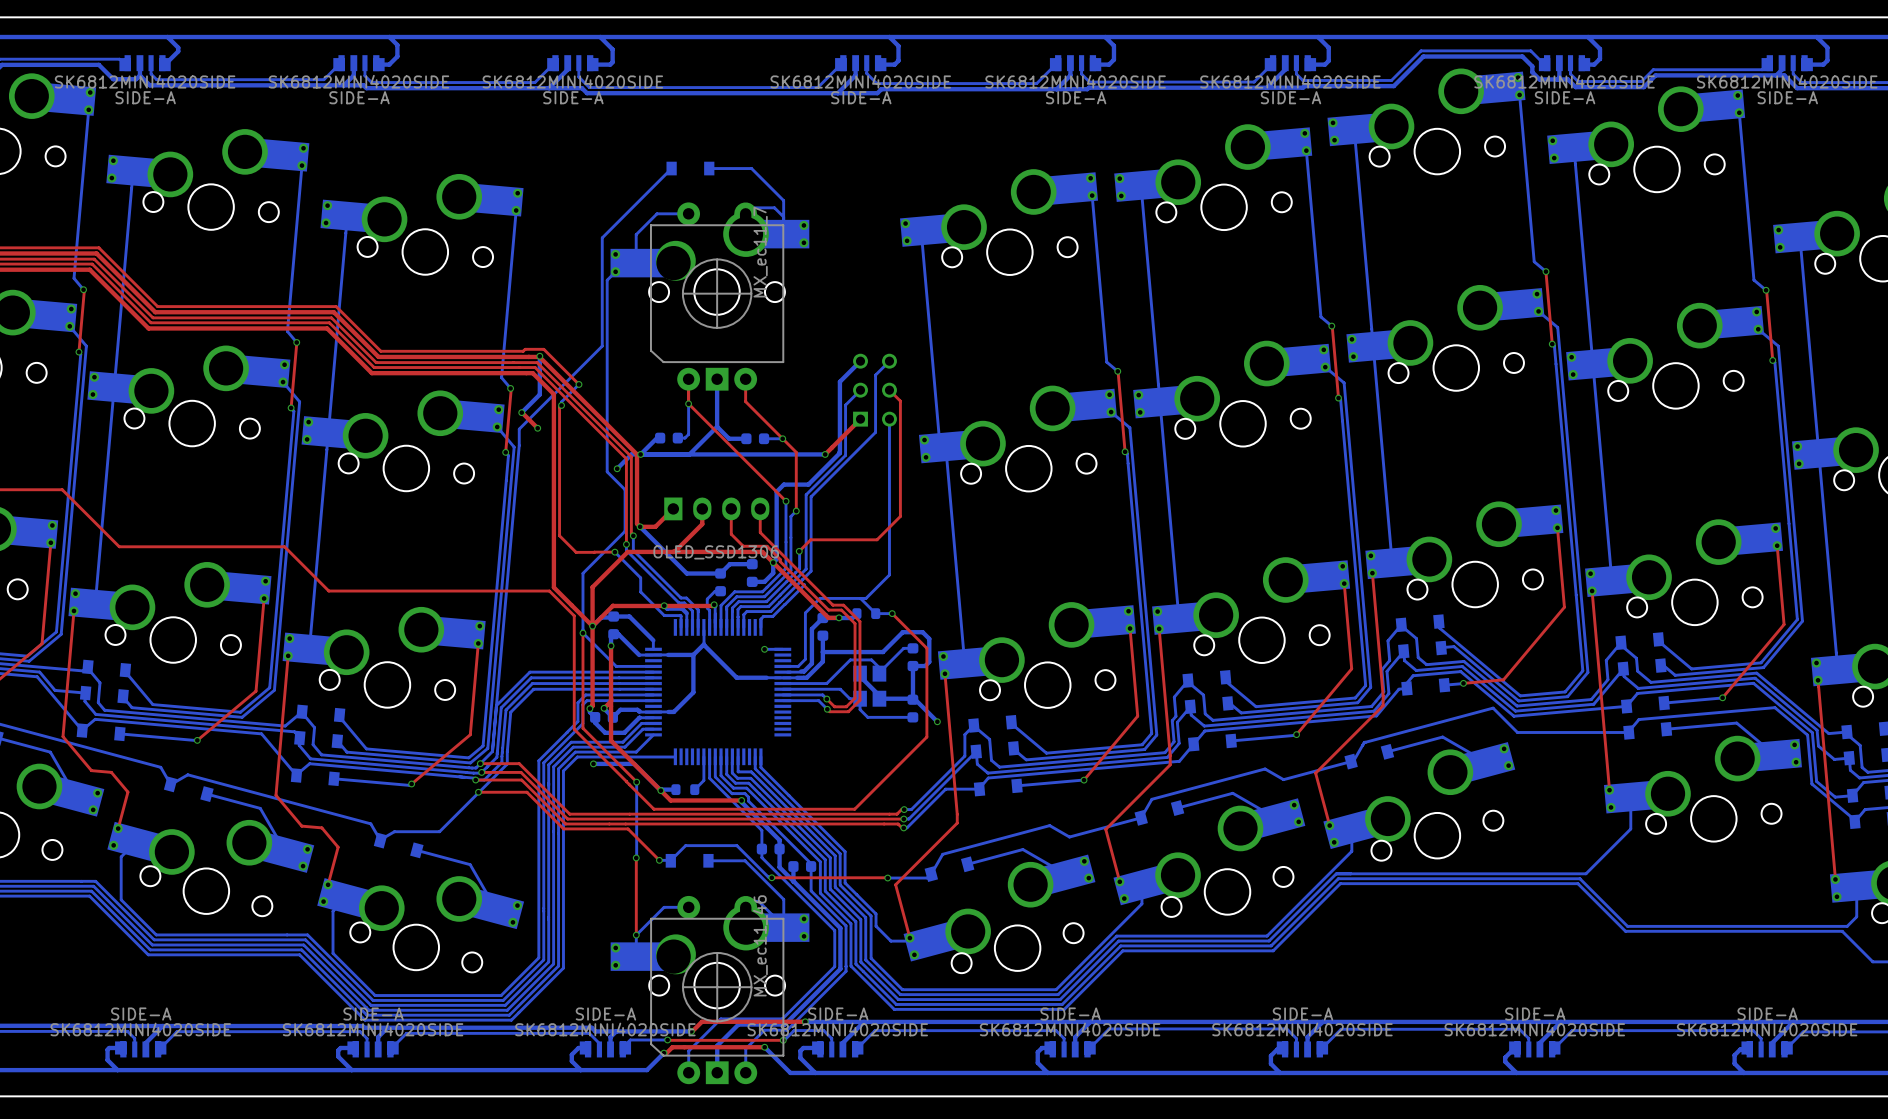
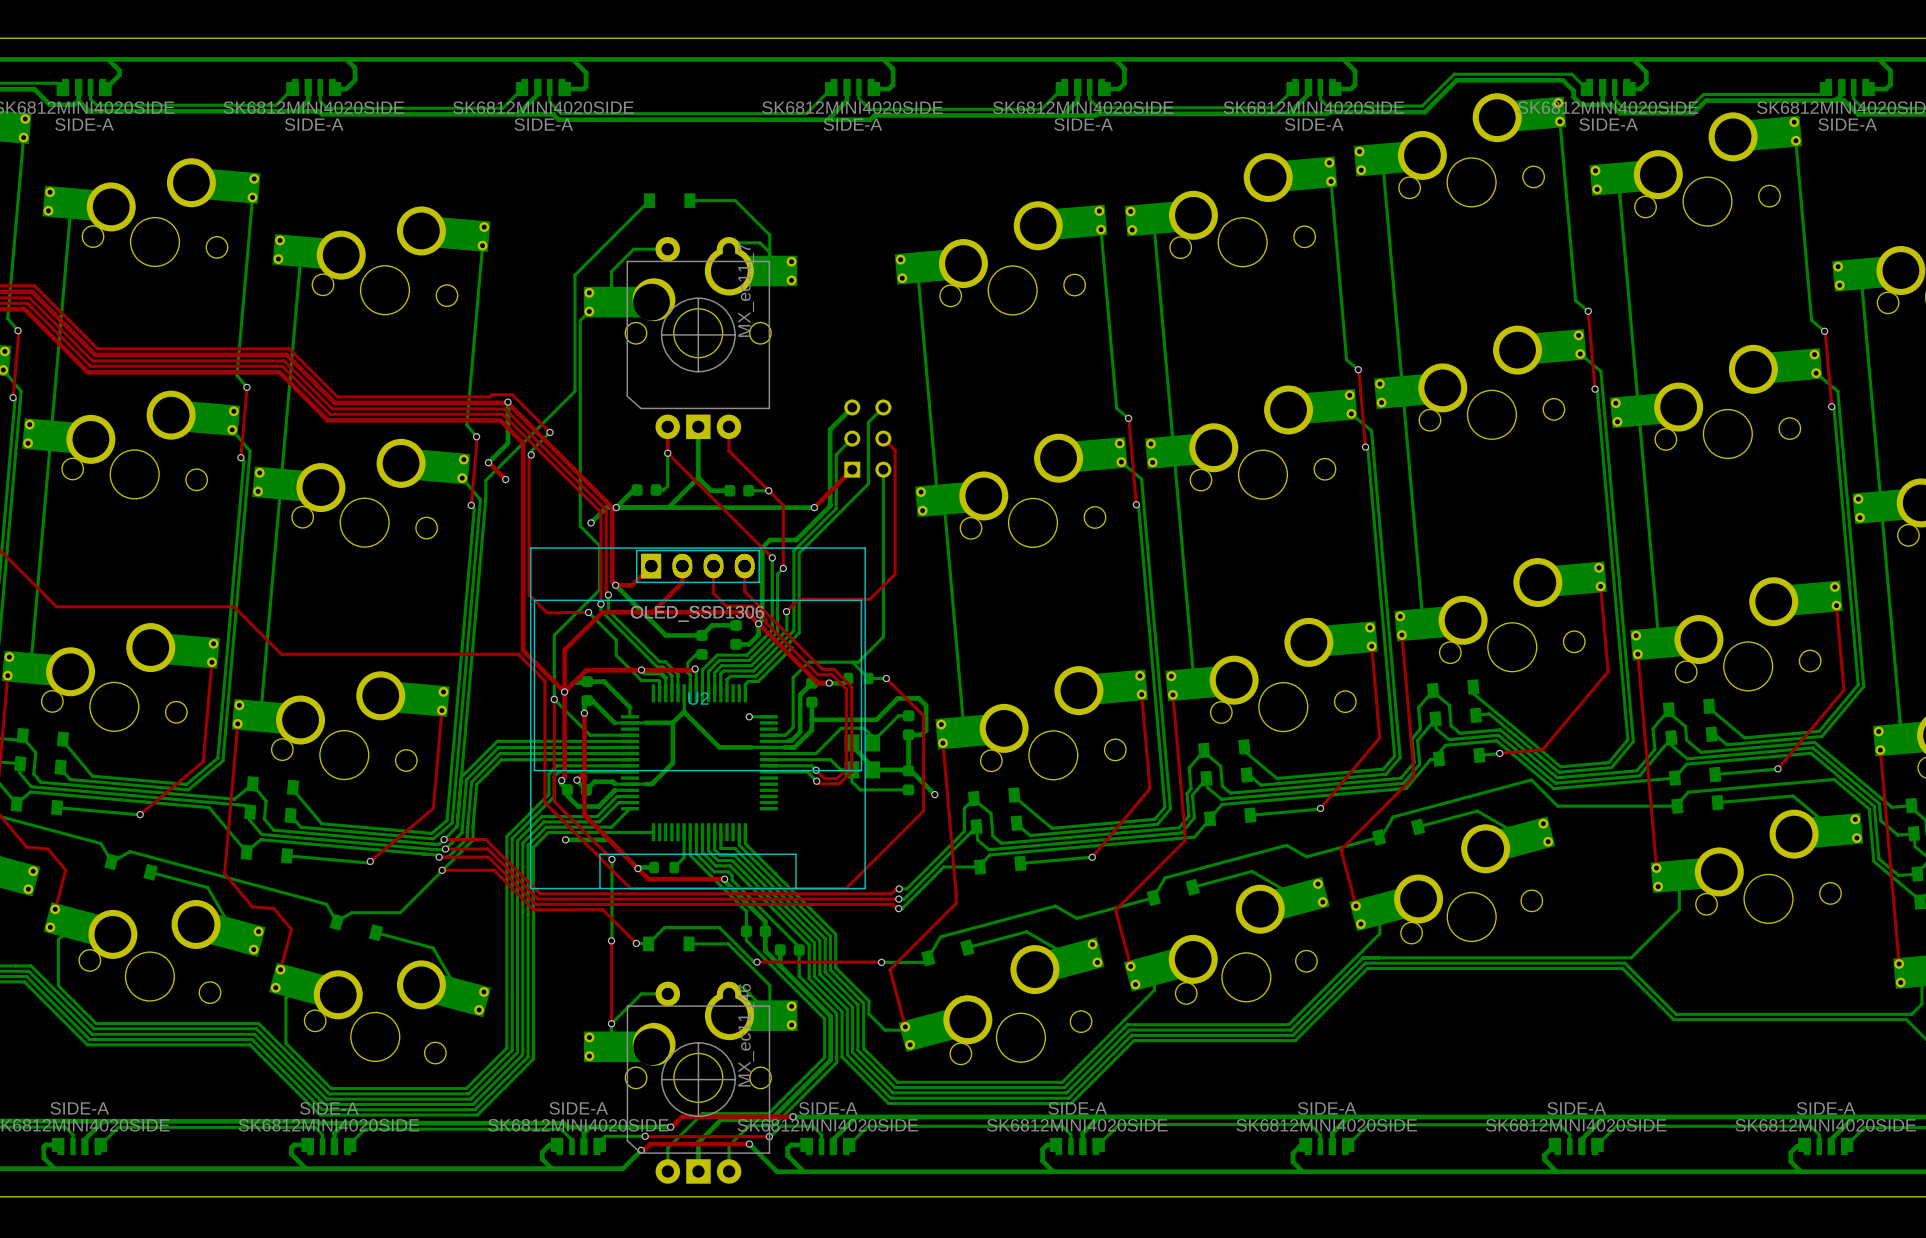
U2: none -> OLED_SSD1306 (697, 718)

